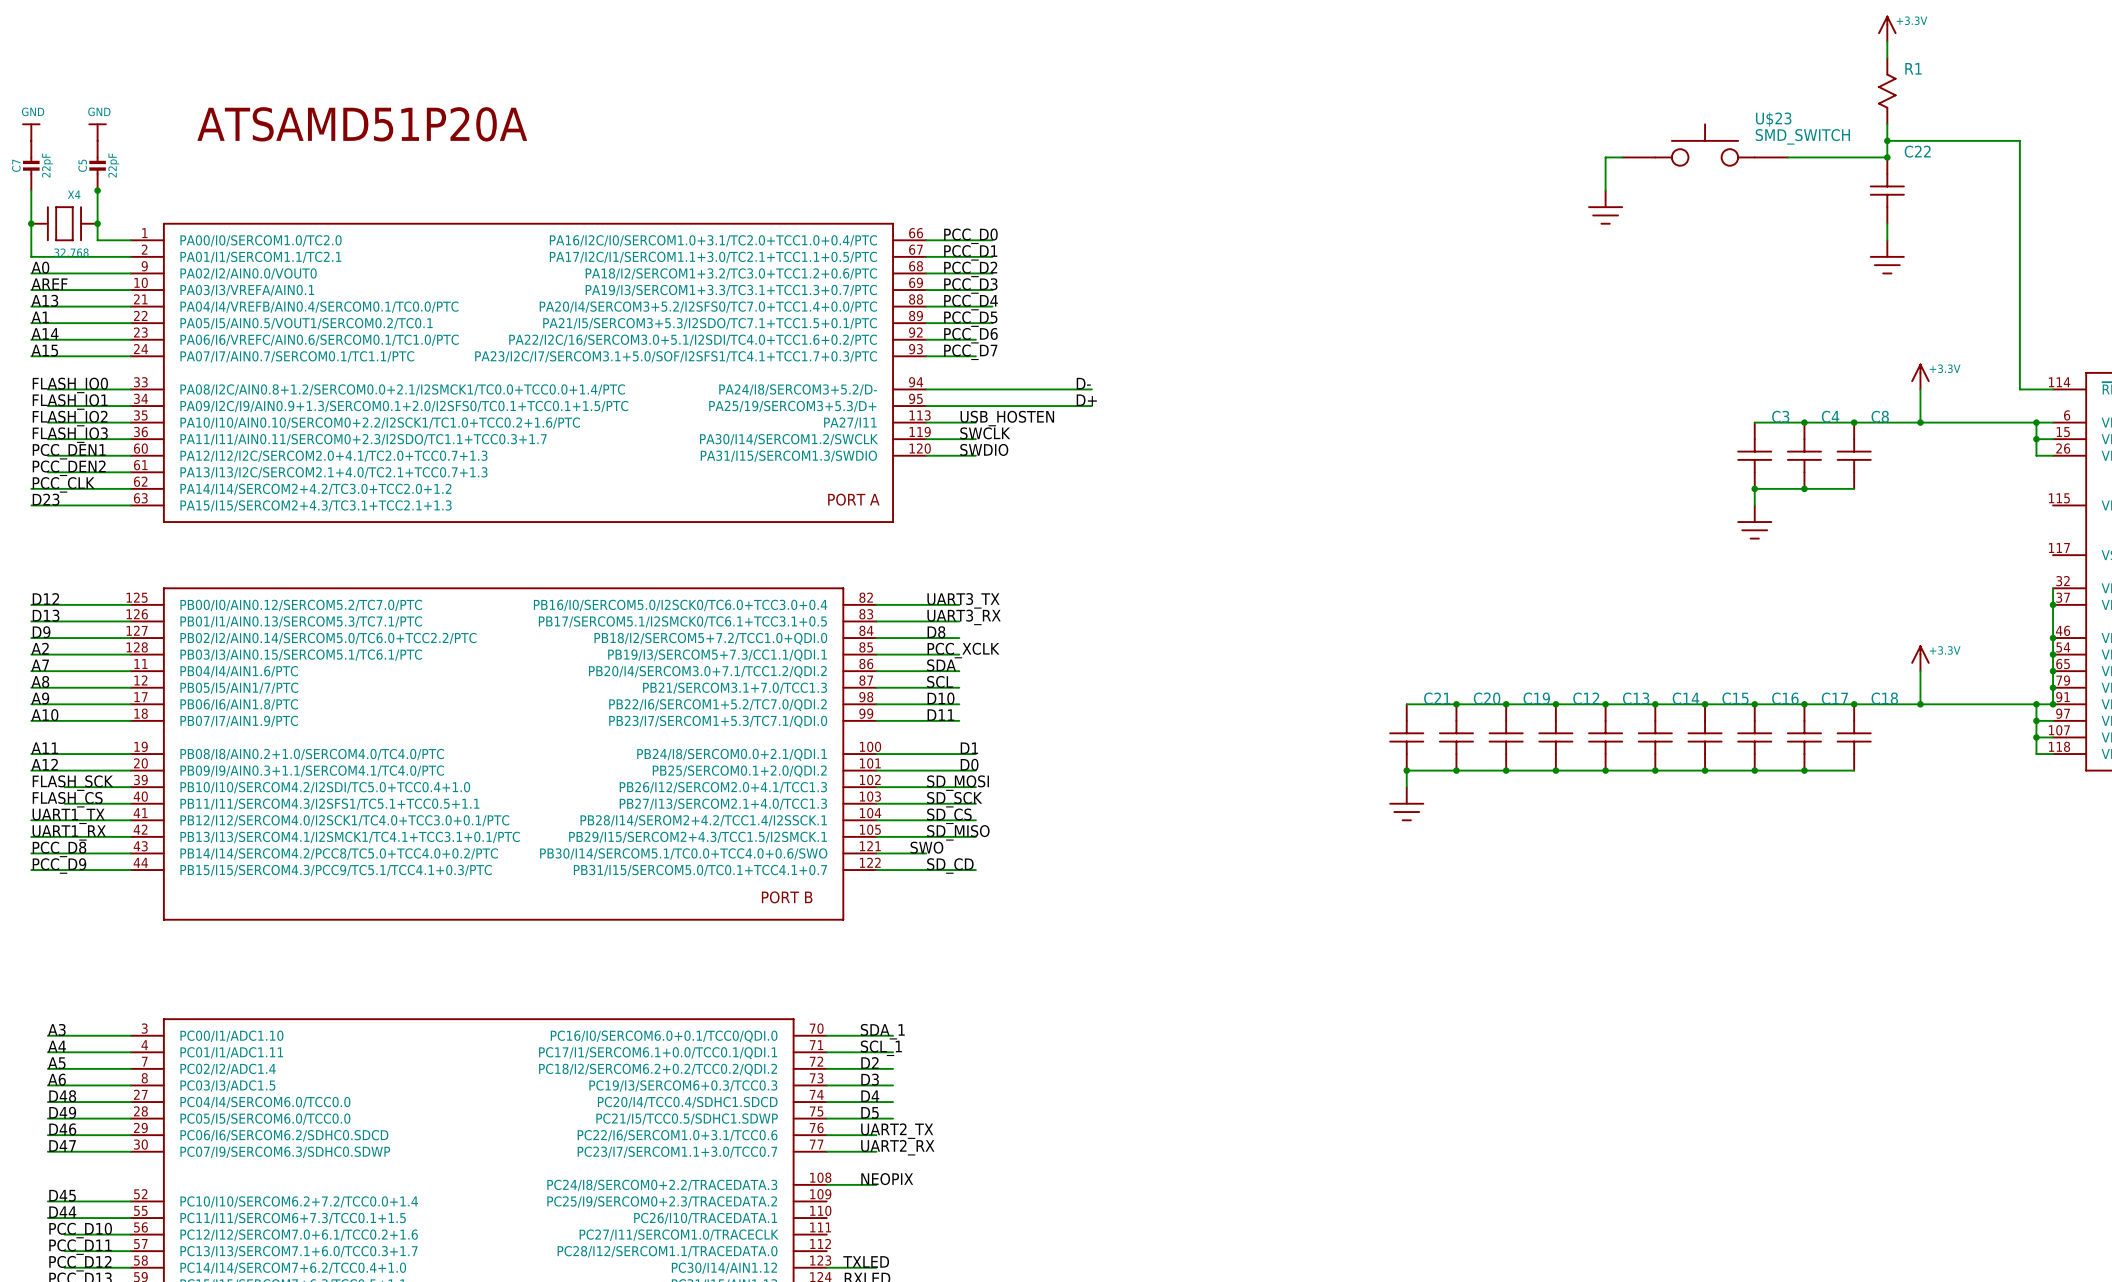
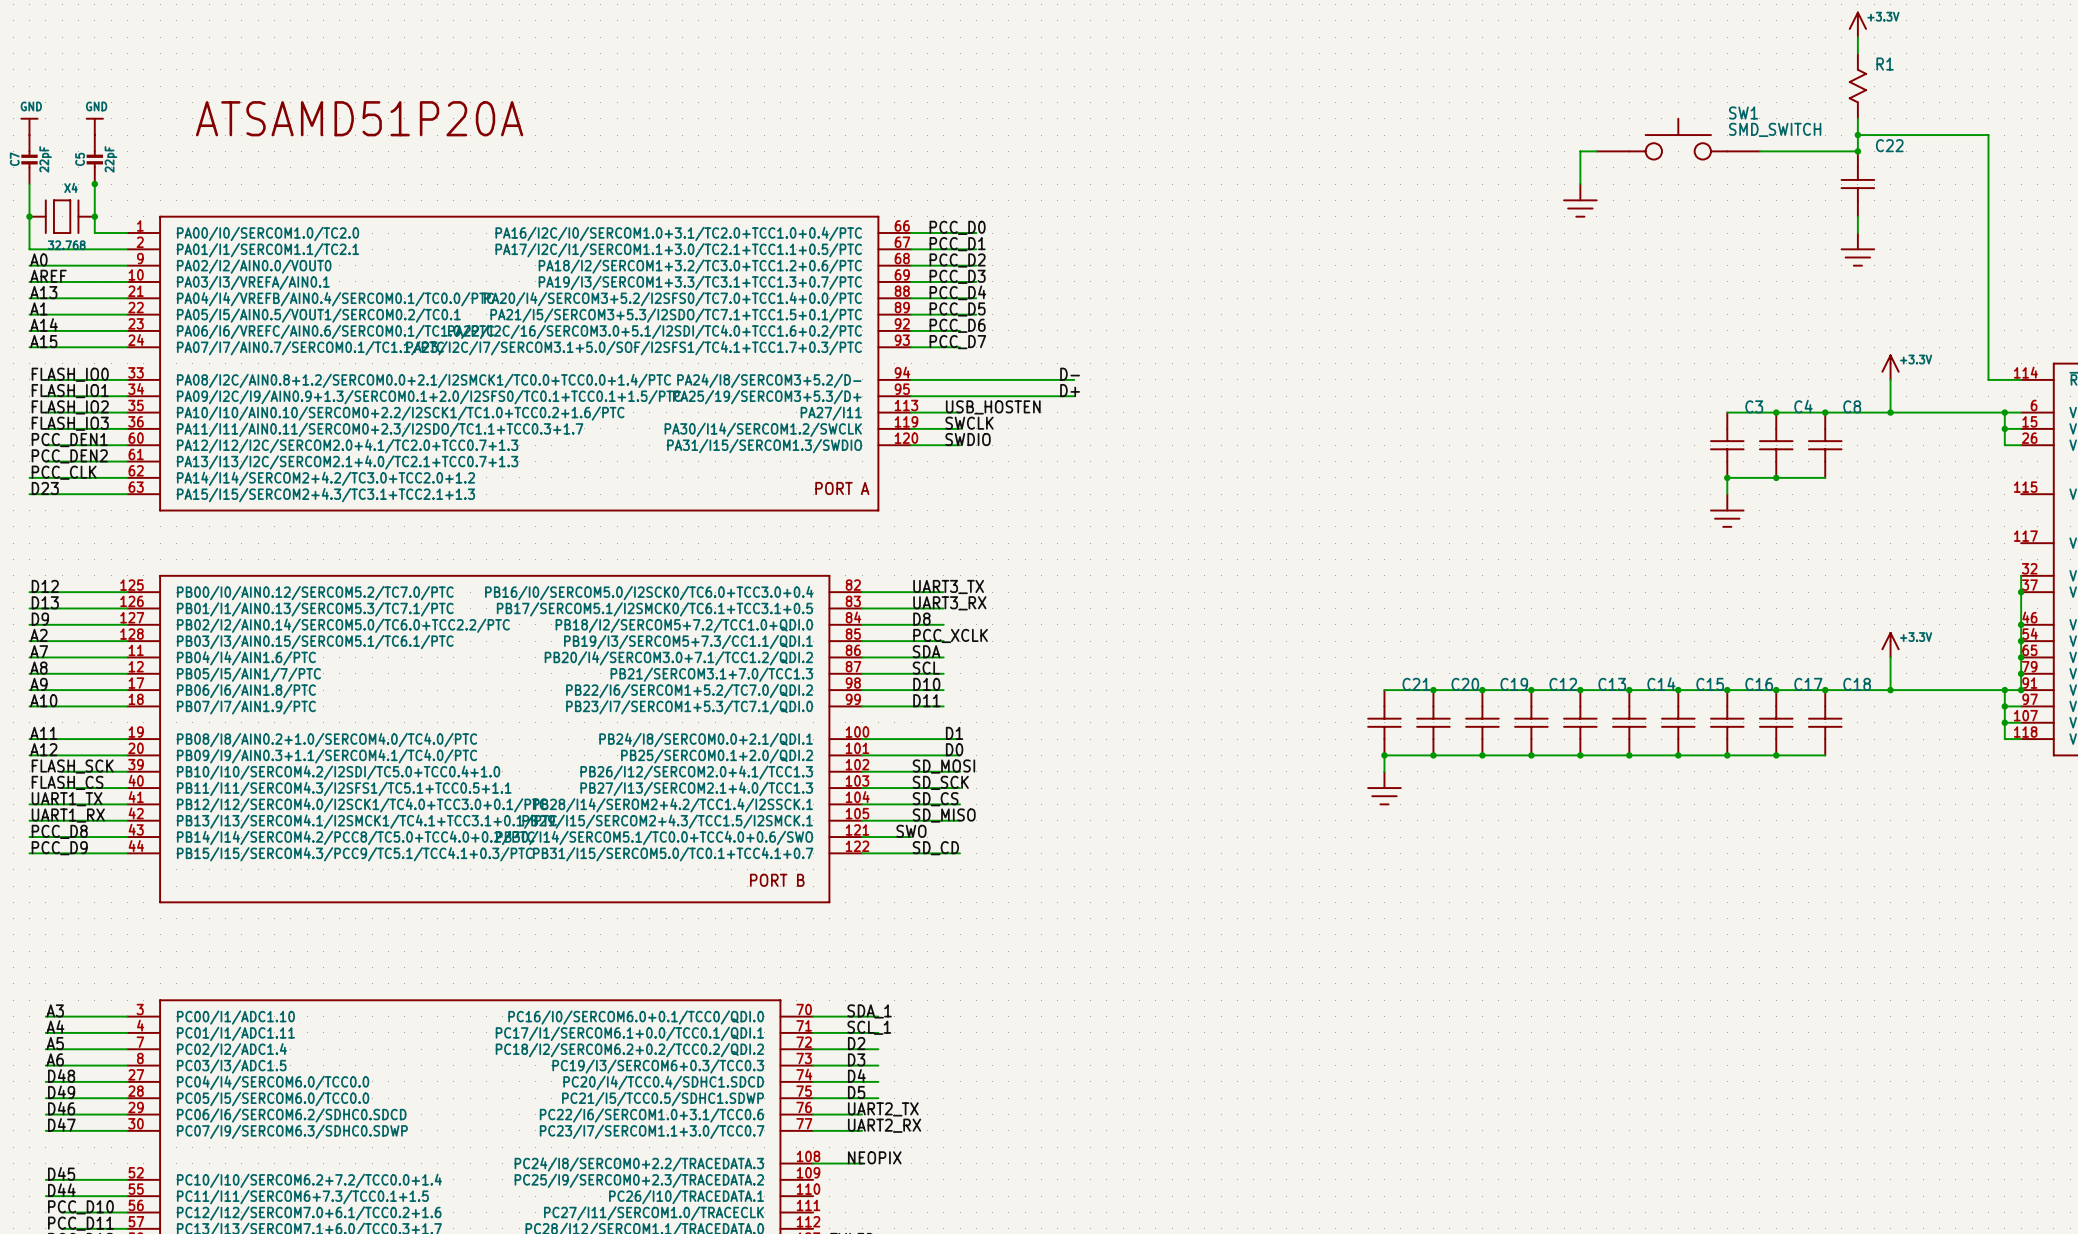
U$23 name: U$23 (1773, 119) -> SW1 (1743, 113)

